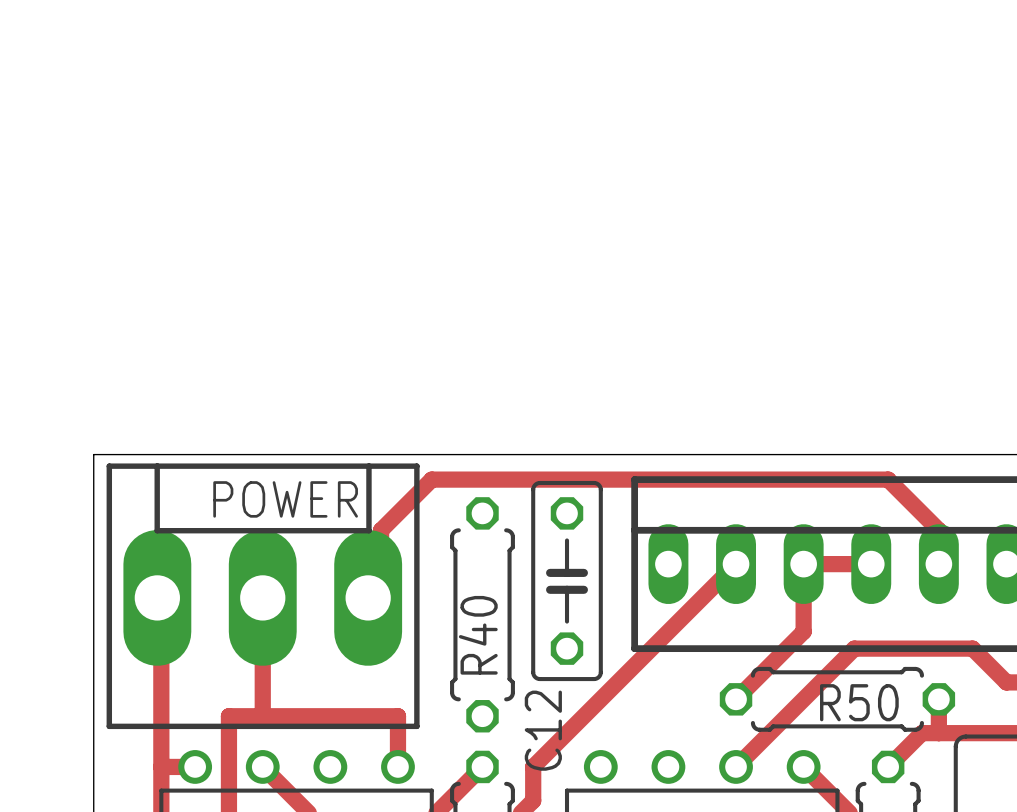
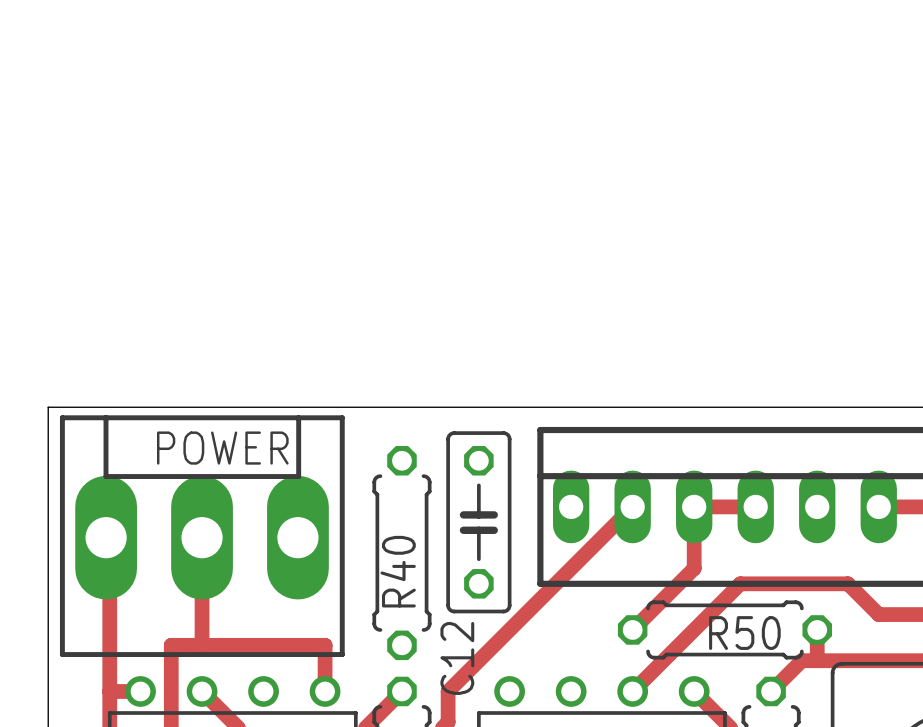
track: (938, 564) (938, 530) (888, 479) (431, 479) (381, 530) (381, 585) (368, 597) -> none

